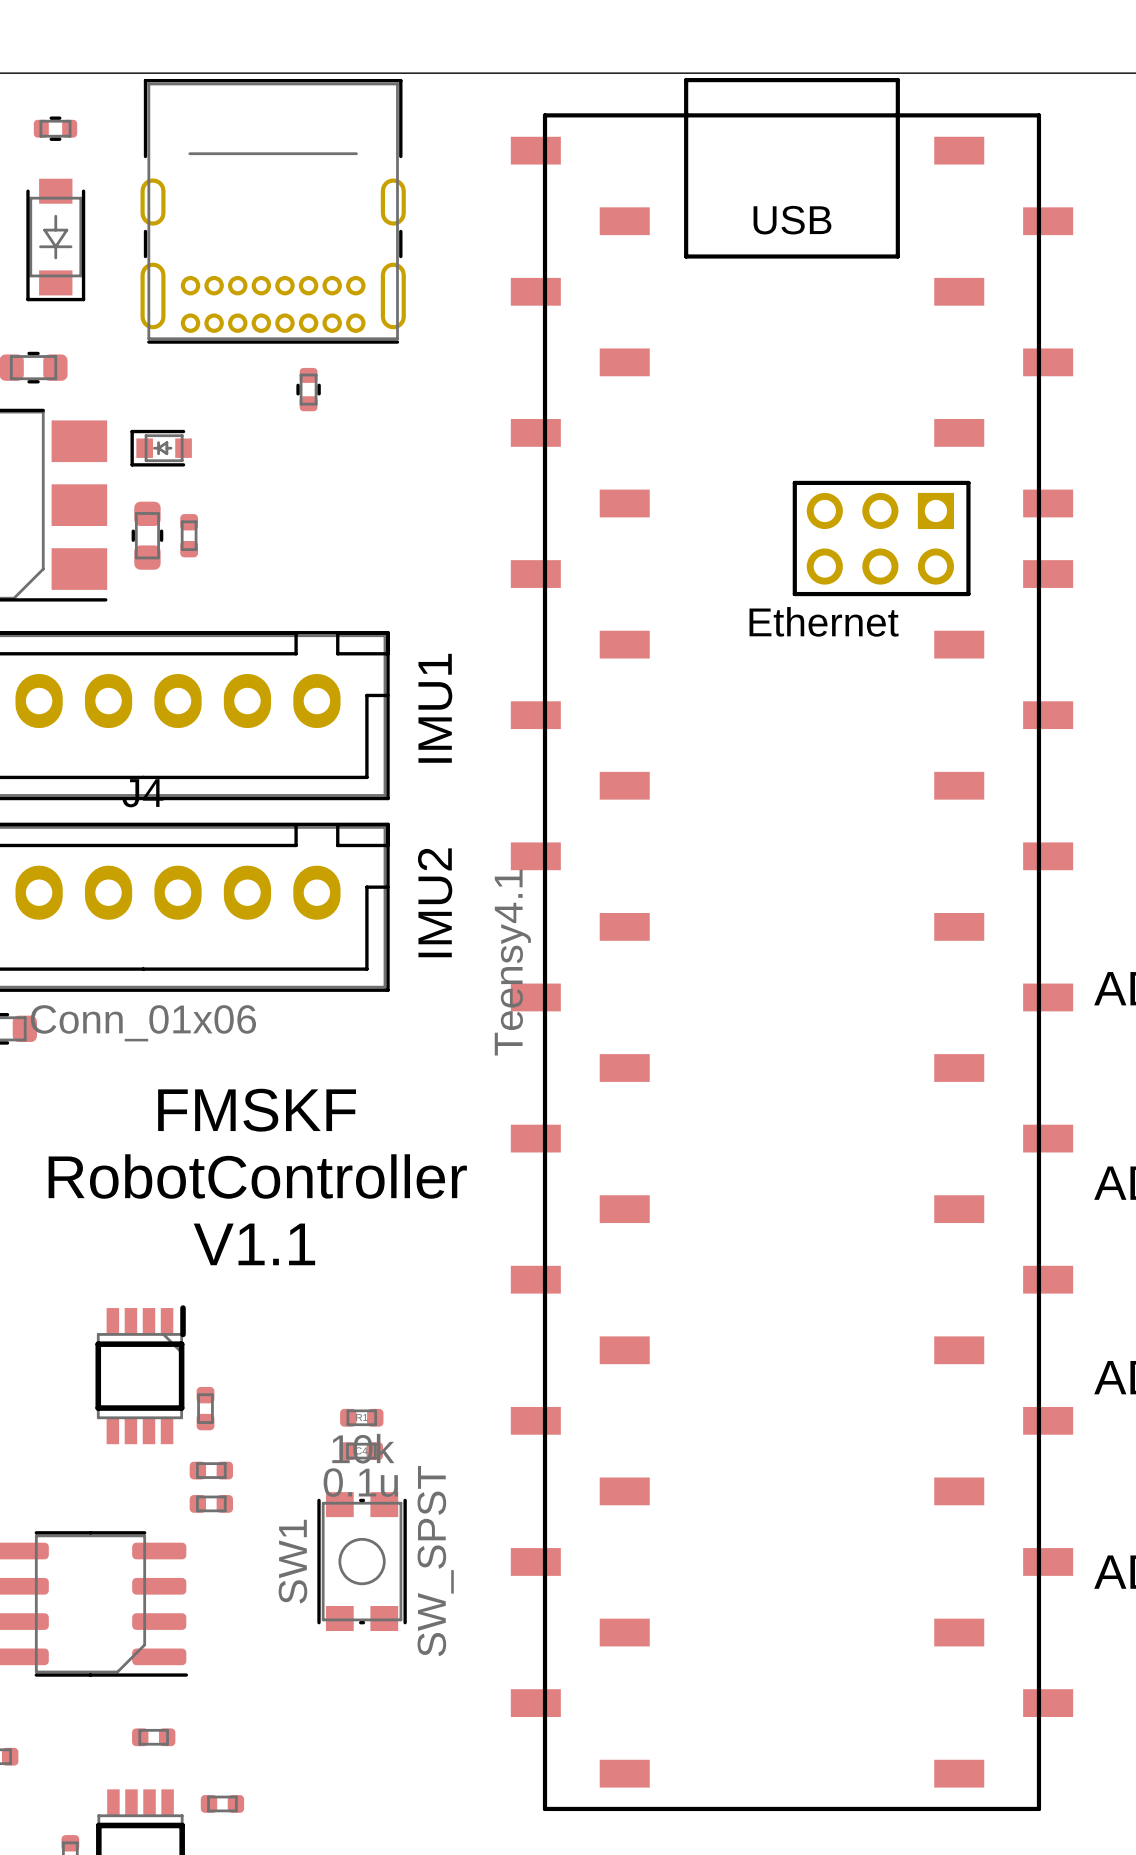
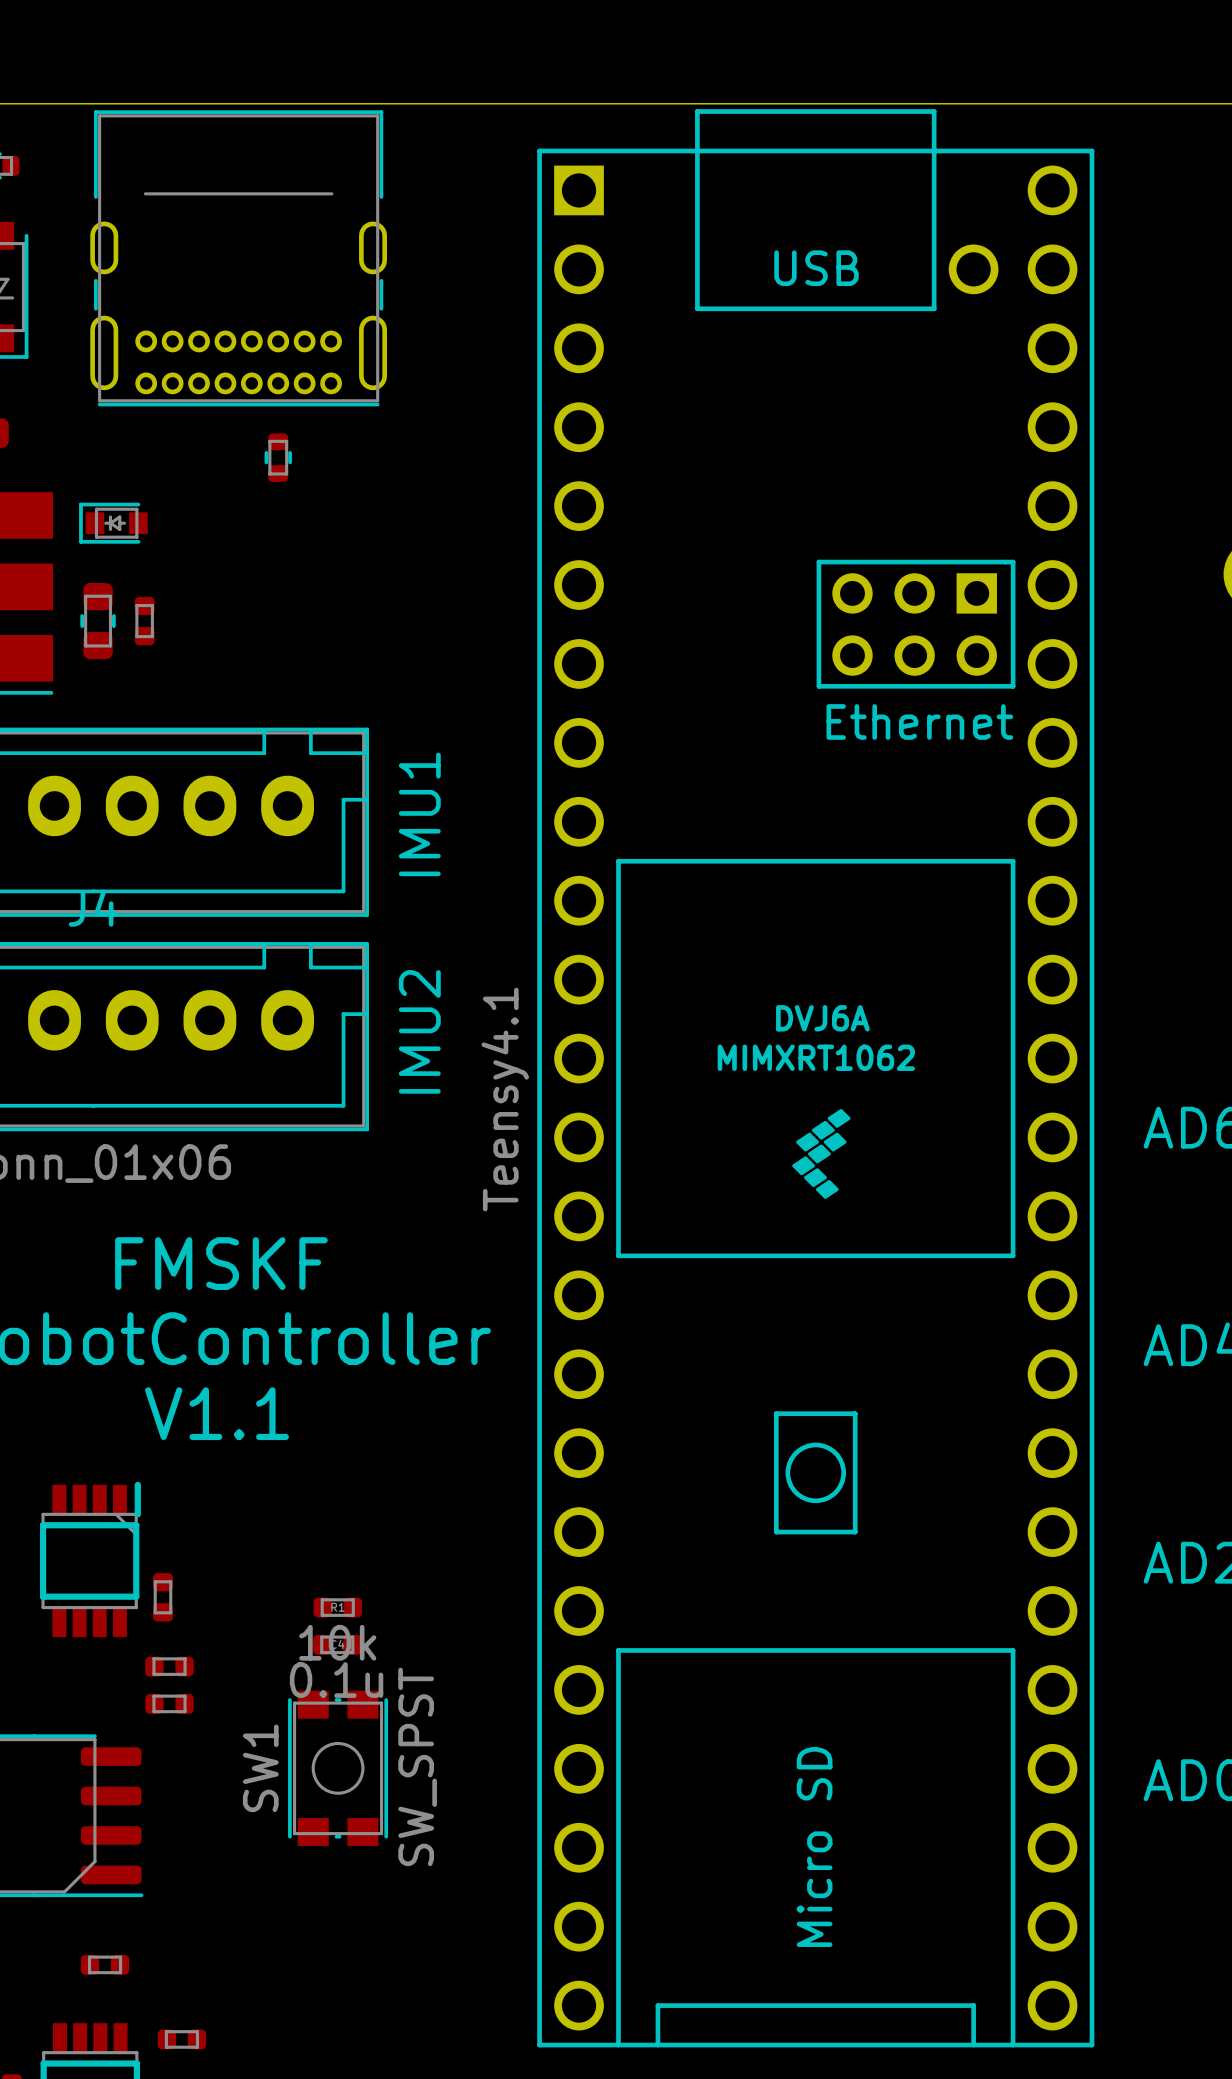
part footprint: [510, 78, 1074, 1812] -> [537, 109, 1095, 2048]

